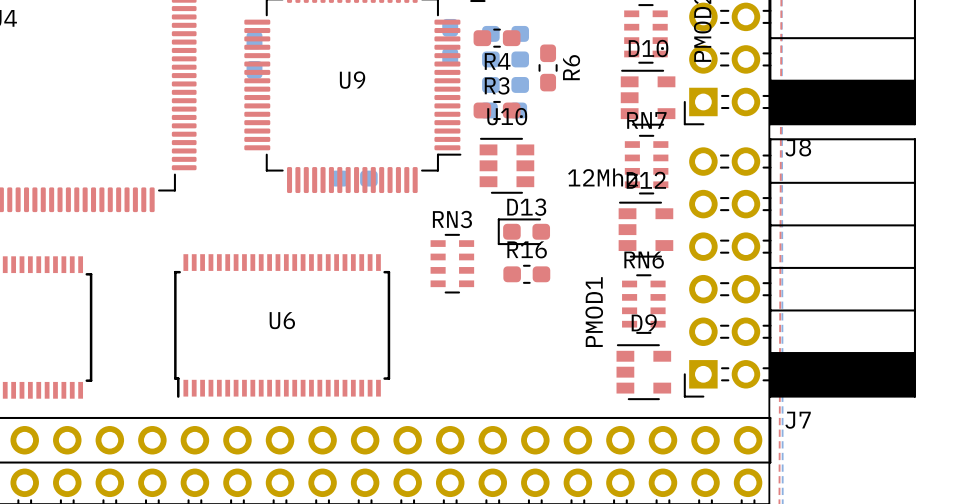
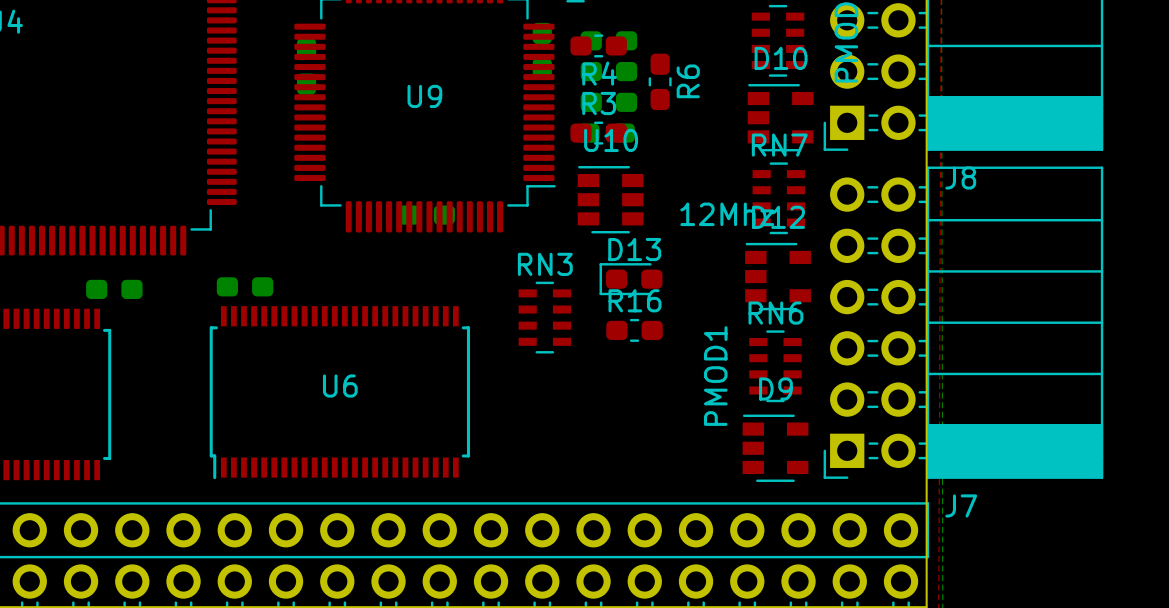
part: none -> (245, 286)
part: none -> (114, 289)

